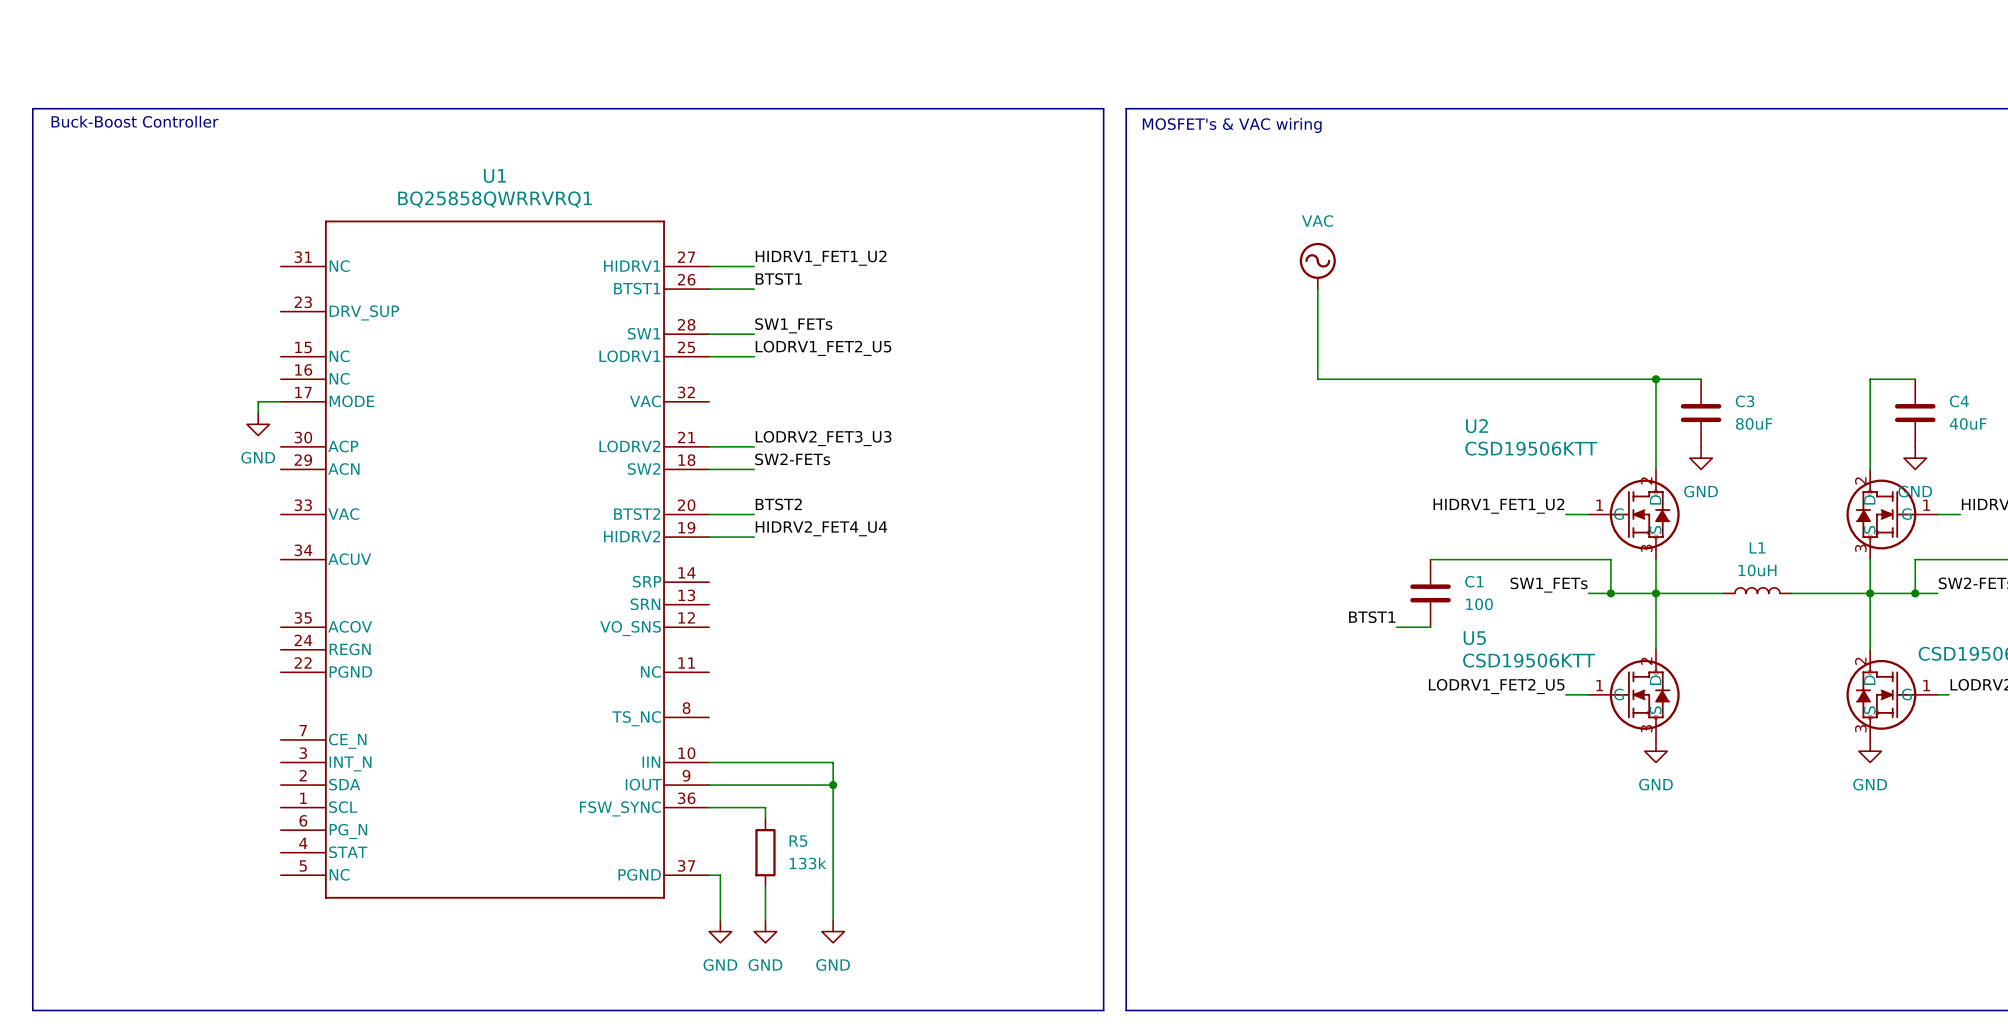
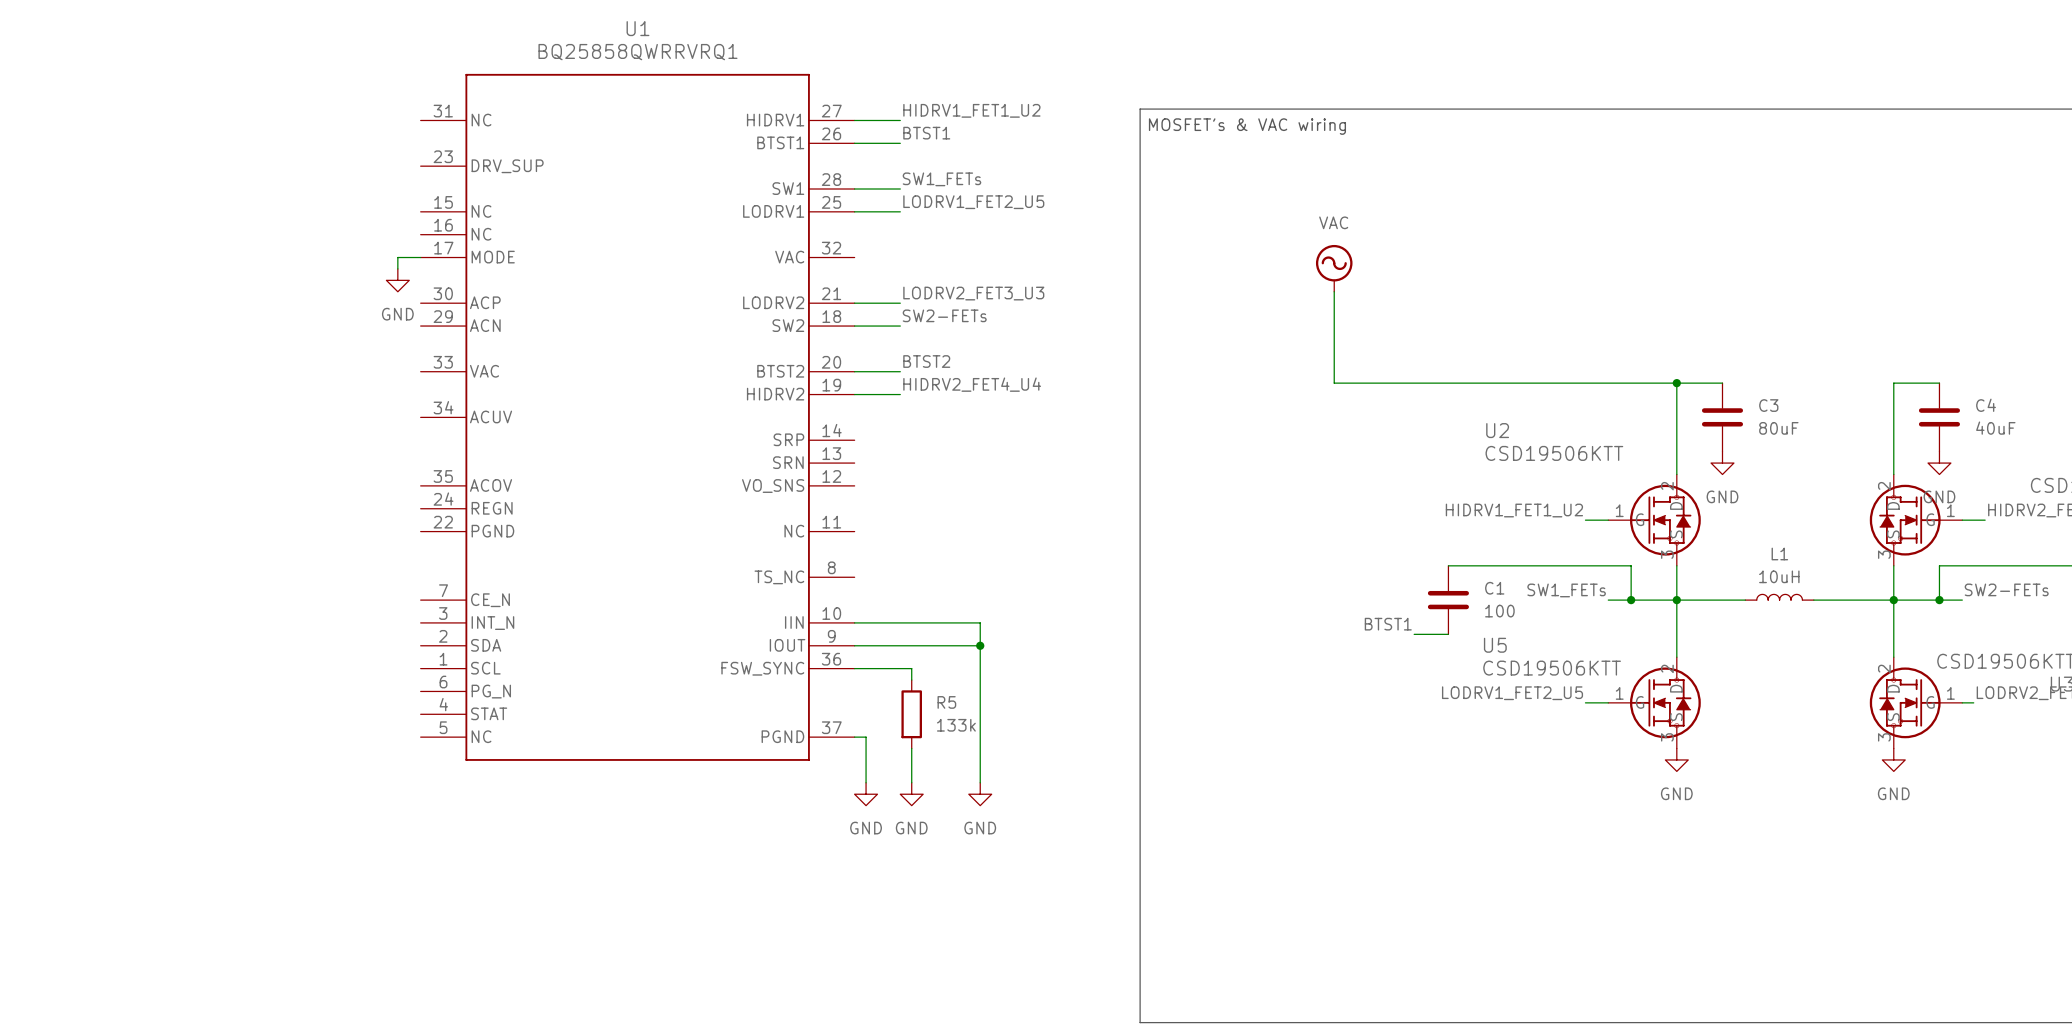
line: (32, 108) (1103, 108) (1103, 1010) (32, 1010) (32, 108) -> none
text: Buck-Boost Controller (134, 121) -> none
label position: HIDRV1_FET1_U2 (821, 258) -> HIDRV1_FET1_U2 (971, 110)
wire: (709, 266) (754, 266) -> (854, 120) (900, 120)
label position: BTST1 (778, 279) -> BTST1 (926, 133)
wire: (709, 289) (754, 289) -> (854, 143) (900, 143)
label position: SW1_FETs (793, 325) -> SW1_FETs (941, 179)
wire: (709, 334) (754, 334) -> (854, 189) (900, 189)
label position: LODRV1_FET2_U5 (823, 348) -> LODRV1_FET2_U5 (973, 202)
wire: (709, 356) (754, 356) -> (854, 211) (900, 211)
wire: (280, 401) (258, 401) (258, 413) -> (420, 257) (397, 257) (397, 268)
power symbol position: GND (258, 424) -> GND (397, 280)
label position: LODRV2_FET3_U3 (823, 438) -> LODRV2_FET3_U3 (973, 293)
wire: (709, 446) (754, 446) -> (854, 303) (900, 303)
label position: SW2-FETs (792, 459) -> SW2-FETs (944, 315)
wire: (709, 469) (754, 469) -> (854, 326) (900, 326)
label position: BTST2 (778, 504) -> BTST2 (926, 361)
wire: (709, 514) (754, 514) -> (854, 371) (900, 371)
label position: HIDRV2_FET4_U4 (821, 528) -> HIDRV2_FET4_U4 (972, 384)
wire: (709, 537) (754, 537) -> (854, 394) (900, 394)
U1 position: (494, 559) -> (637, 417)
junction: none -> (980, 645)
wire: (709, 762) (833, 762) (833, 920) -> (854, 622) (980, 622) (980, 782)
wire: (709, 785) (833, 785) -> (854, 645) (980, 645)
junction: (833, 785) -> none
power symbol: none -> GND (866, 794)
power symbol: none -> GND (911, 794)
power symbol: none -> GND (980, 794)
wire: (709, 807) (765, 807) (765, 818) -> (854, 668) (911, 668) (911, 680)
R5 position: (765, 852) -> (911, 714)
wire: (709, 875) (720, 875) (720, 920) -> (854, 737) (866, 737) (866, 782)
wire: (765, 886) (765, 920) -> (911, 748) (911, 782)
power symbol: GND (720, 931) -> none
power symbol: GND (765, 931) -> none
power symbol: GND (833, 931) -> none

